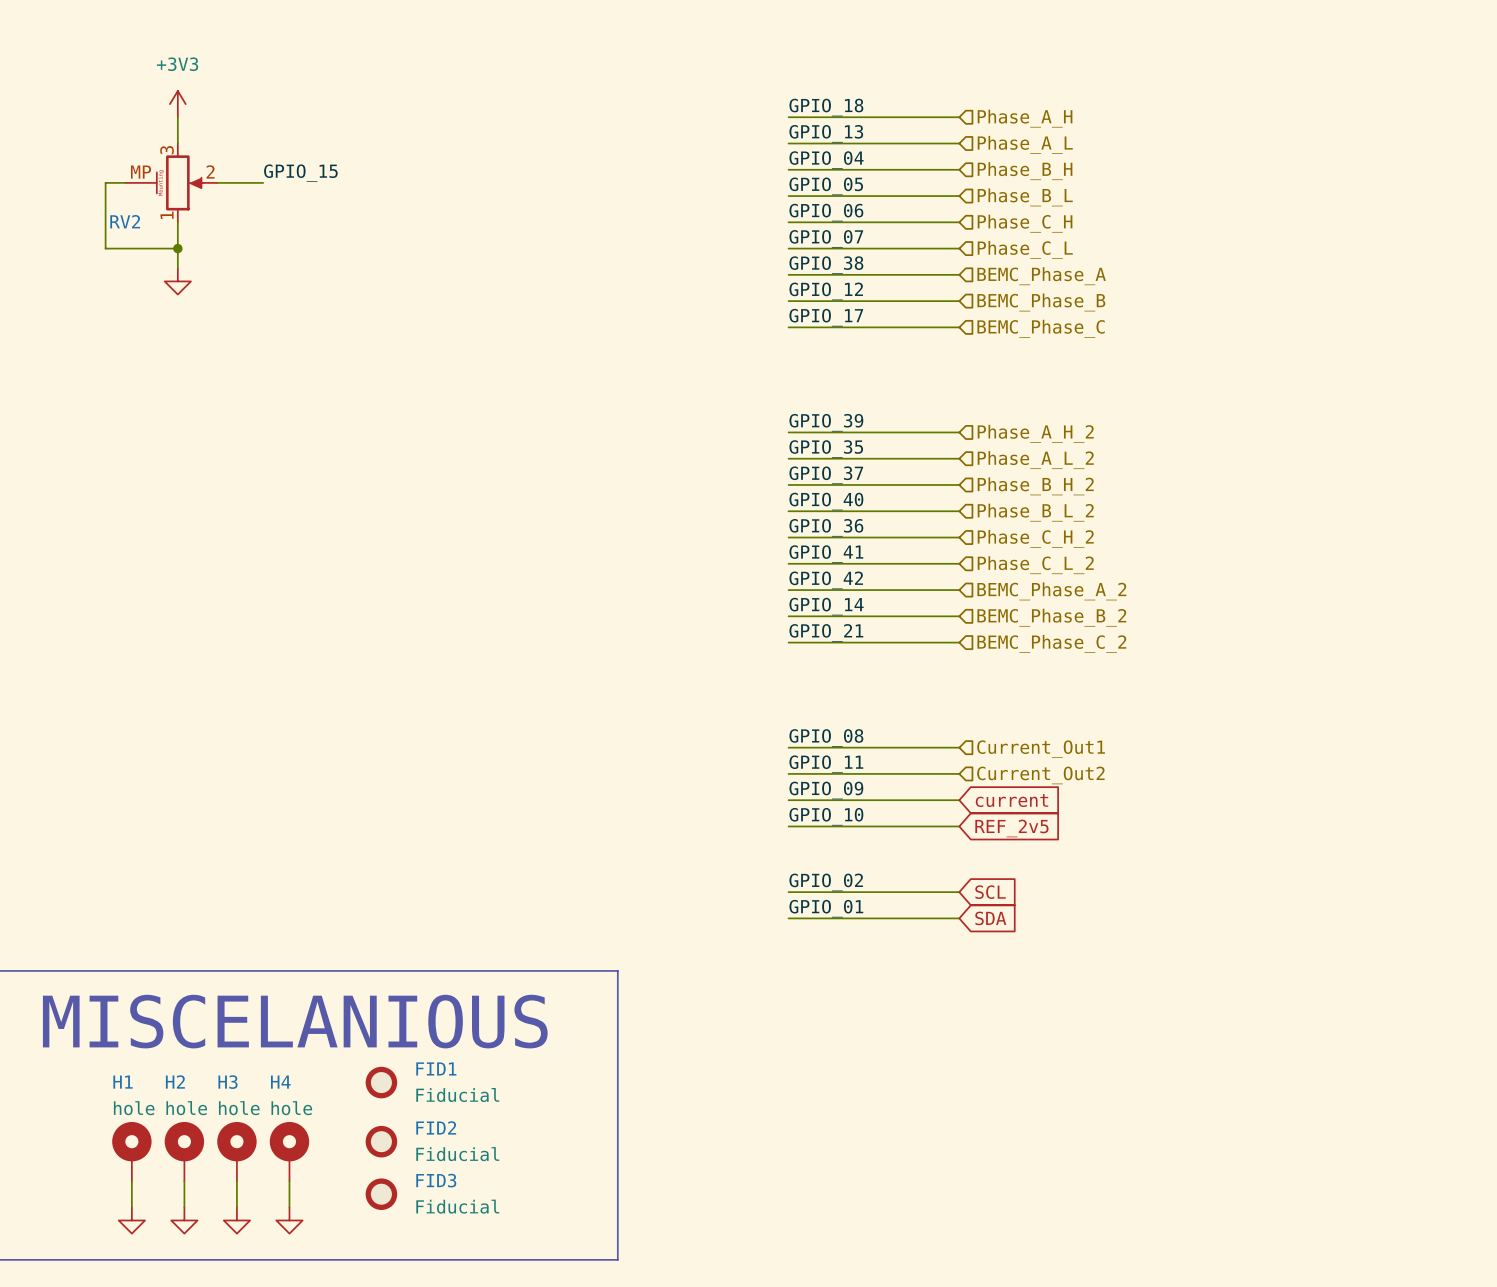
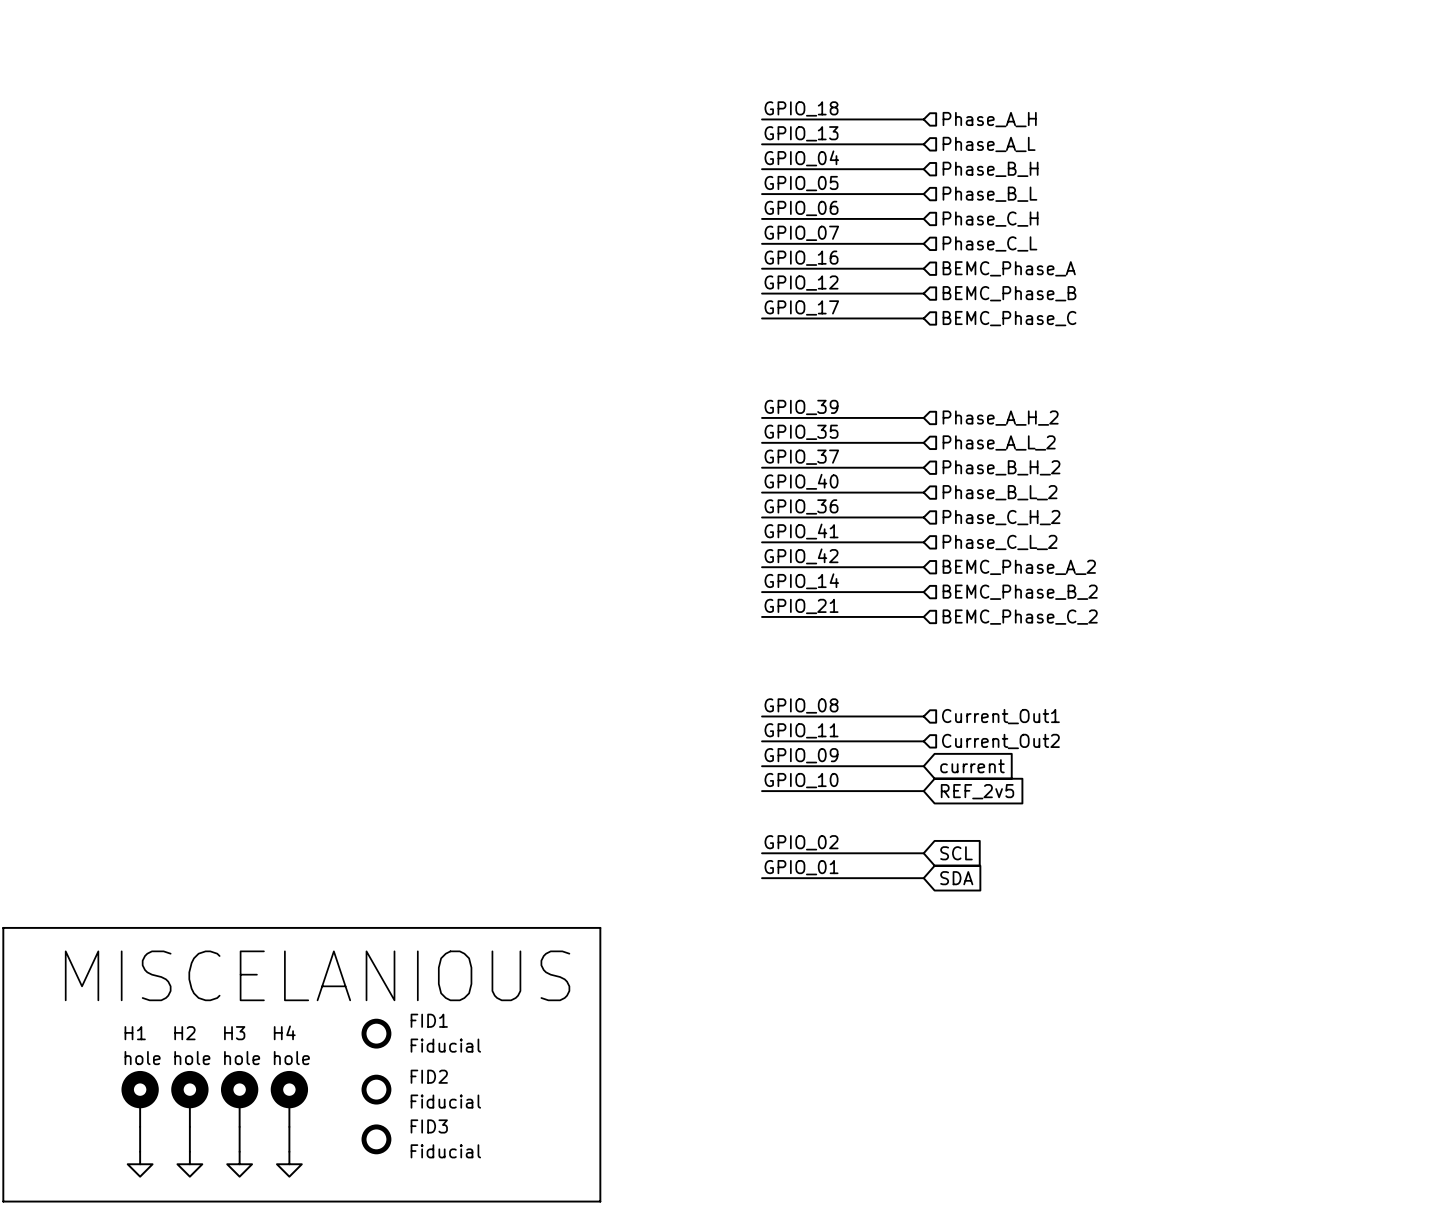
power symbol: +3V3 (177, 104) -> none
wire: (177, 117) (177, 143) -> none
label: GPIO_15 (300, 173) -> none
wire: (125, 182) (105, 182) (105, 248) (177, 248) -> none
RV2: (171, 182) -> none
wire: (217, 182) (263, 182) -> none
wire: (177, 222) (177, 268) -> none
junction: (177, 248) -> none
label: GPIO_38 (826, 265) -> GPIO_16 (801, 258)
power symbol: (177, 281) -> none

